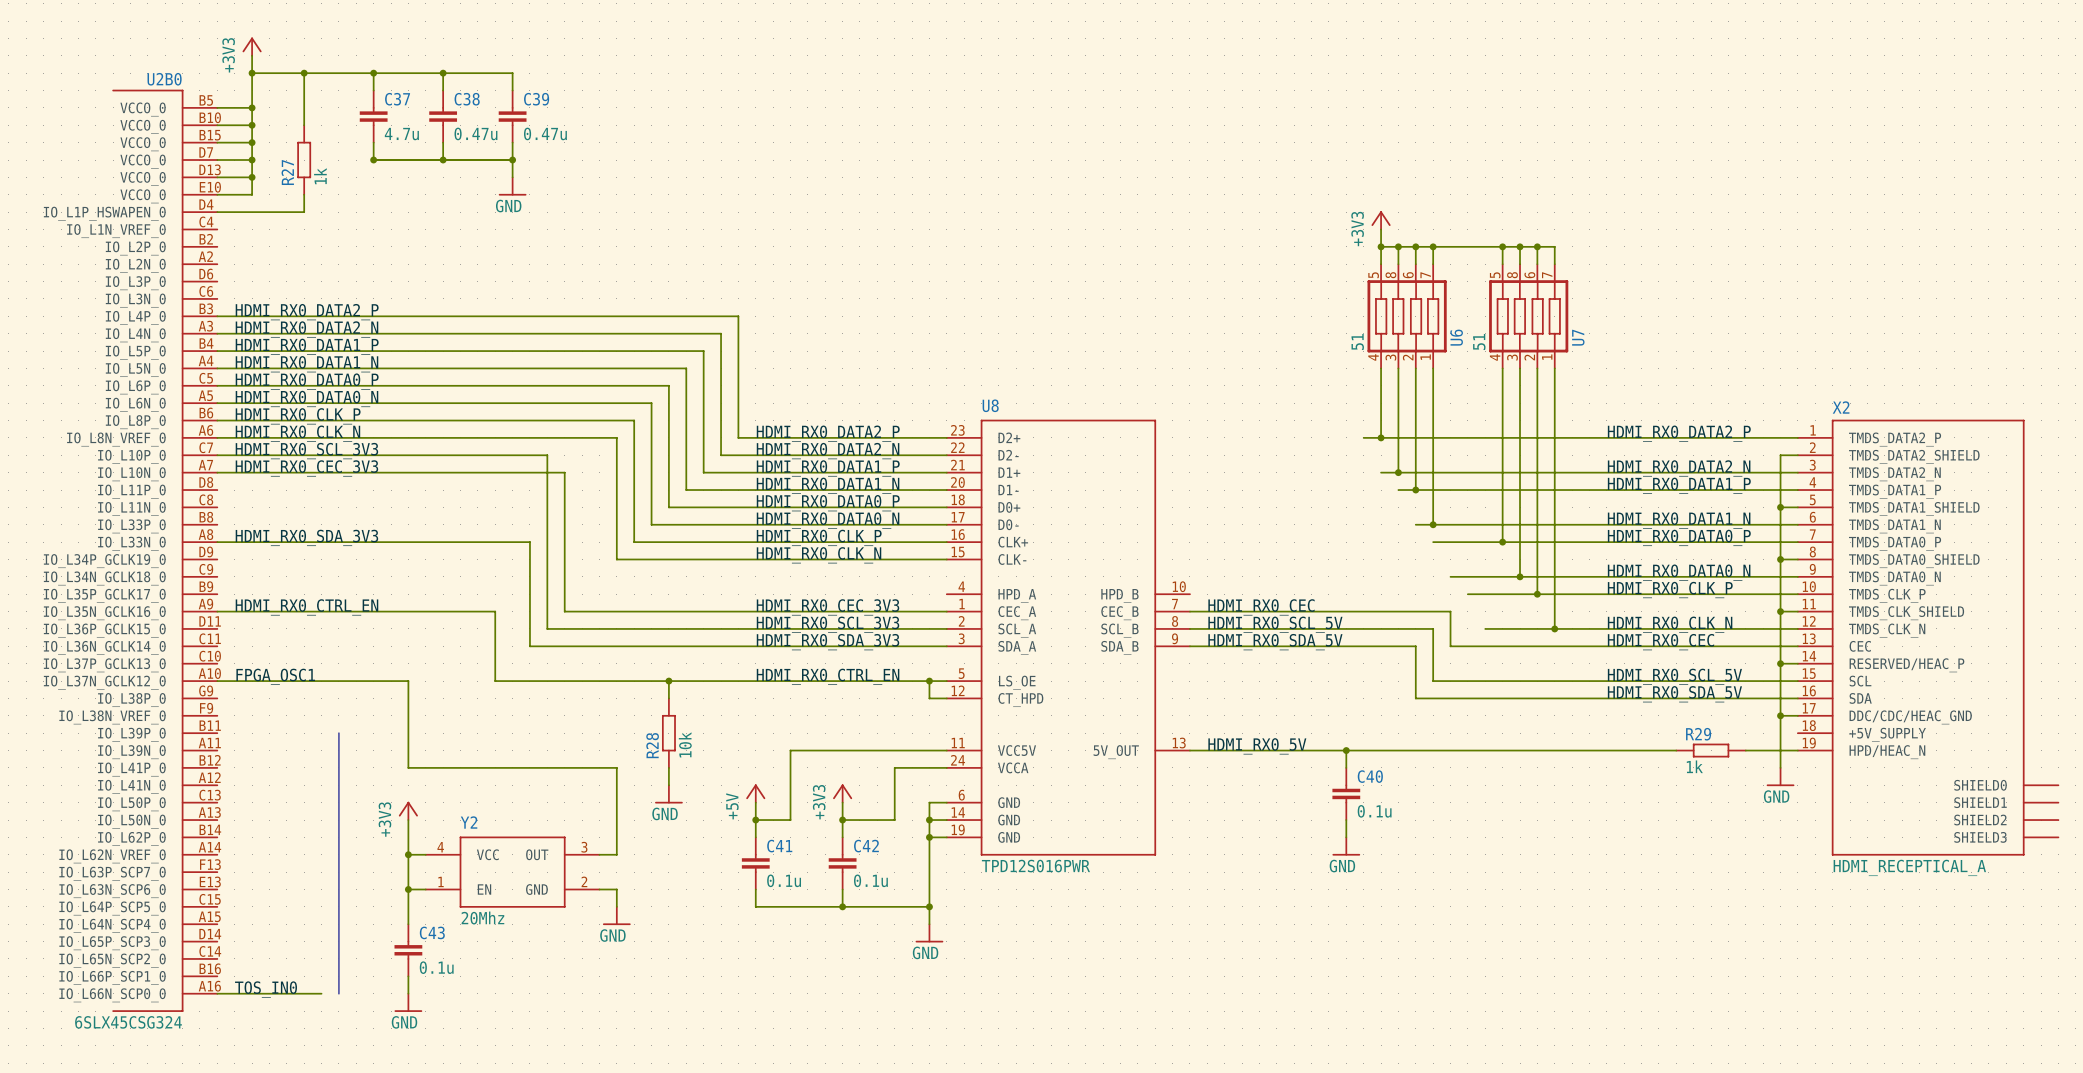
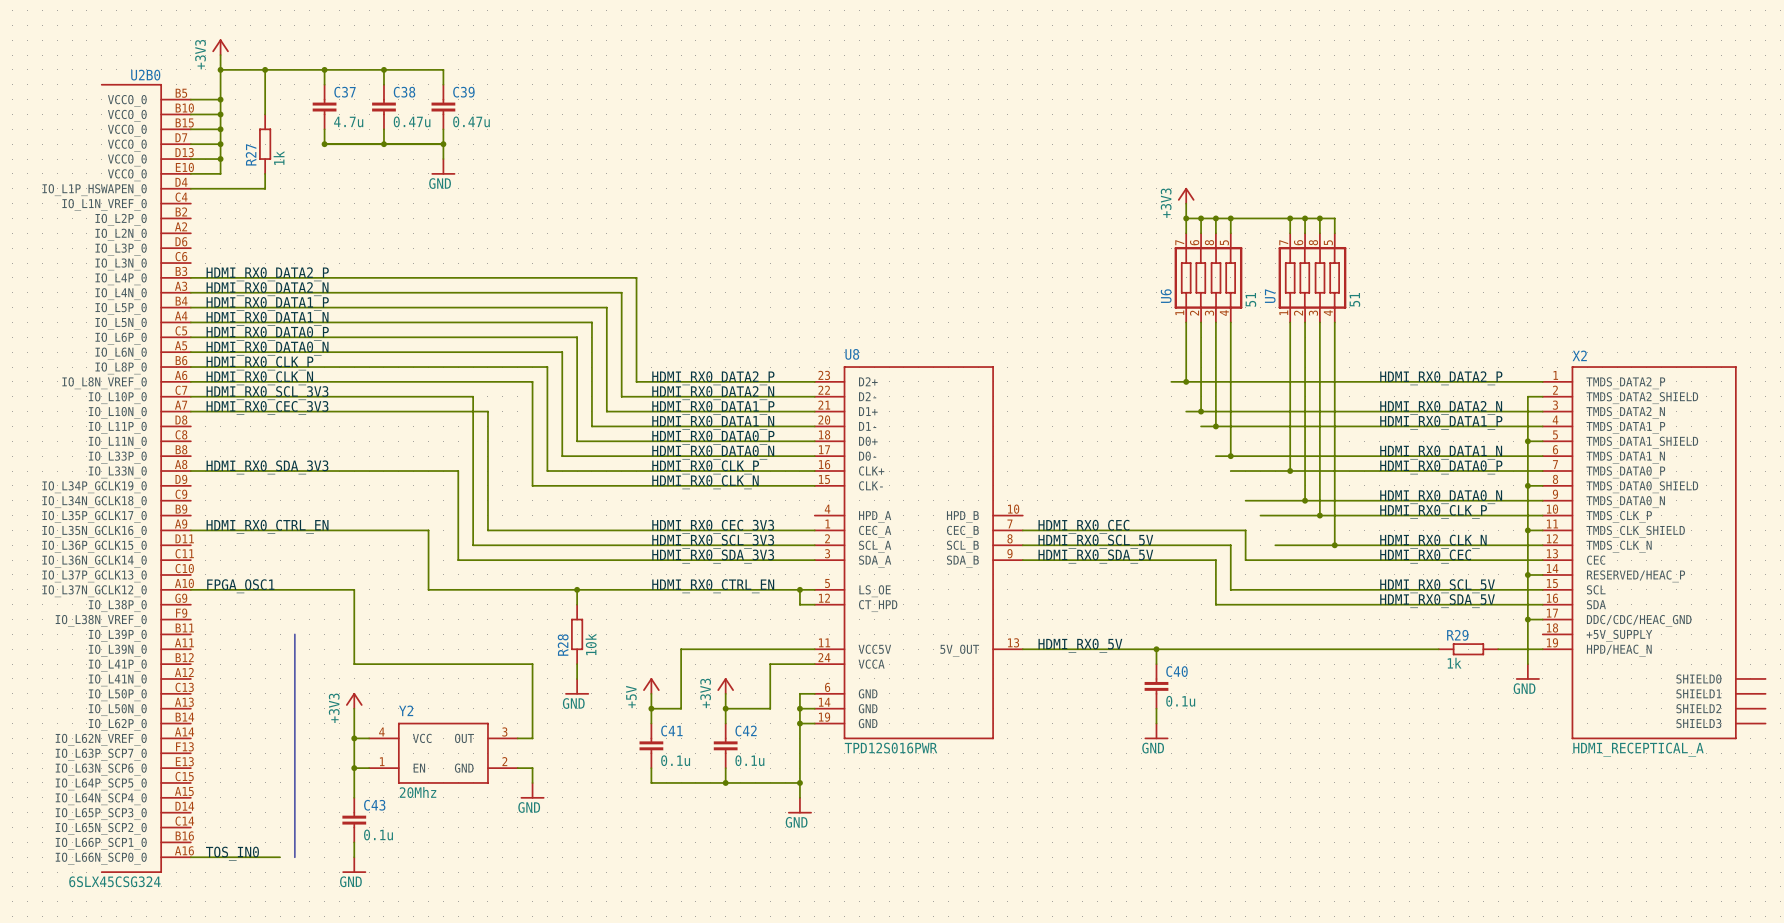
U6 flip: as is (1407, 316) -> left-right (1208, 277)
U7 flip: as is (1528, 316) -> left-right (1312, 277)

